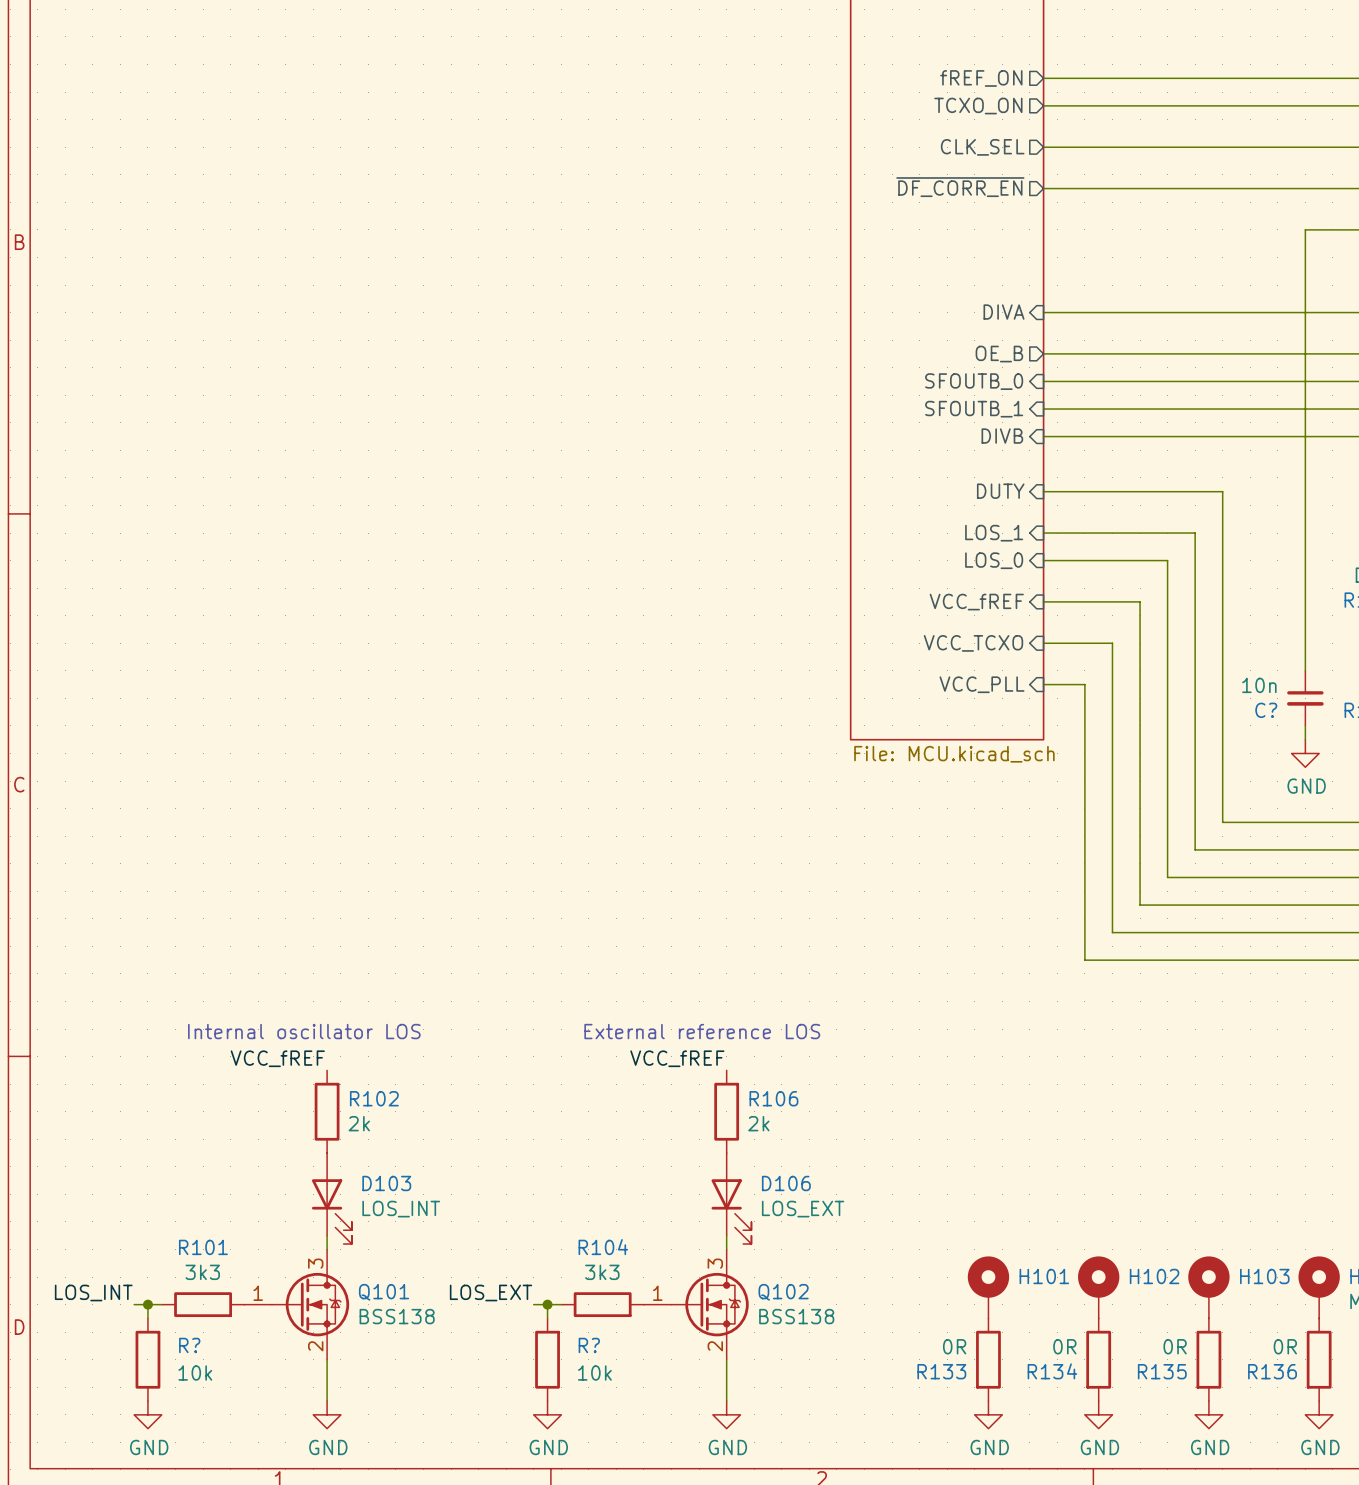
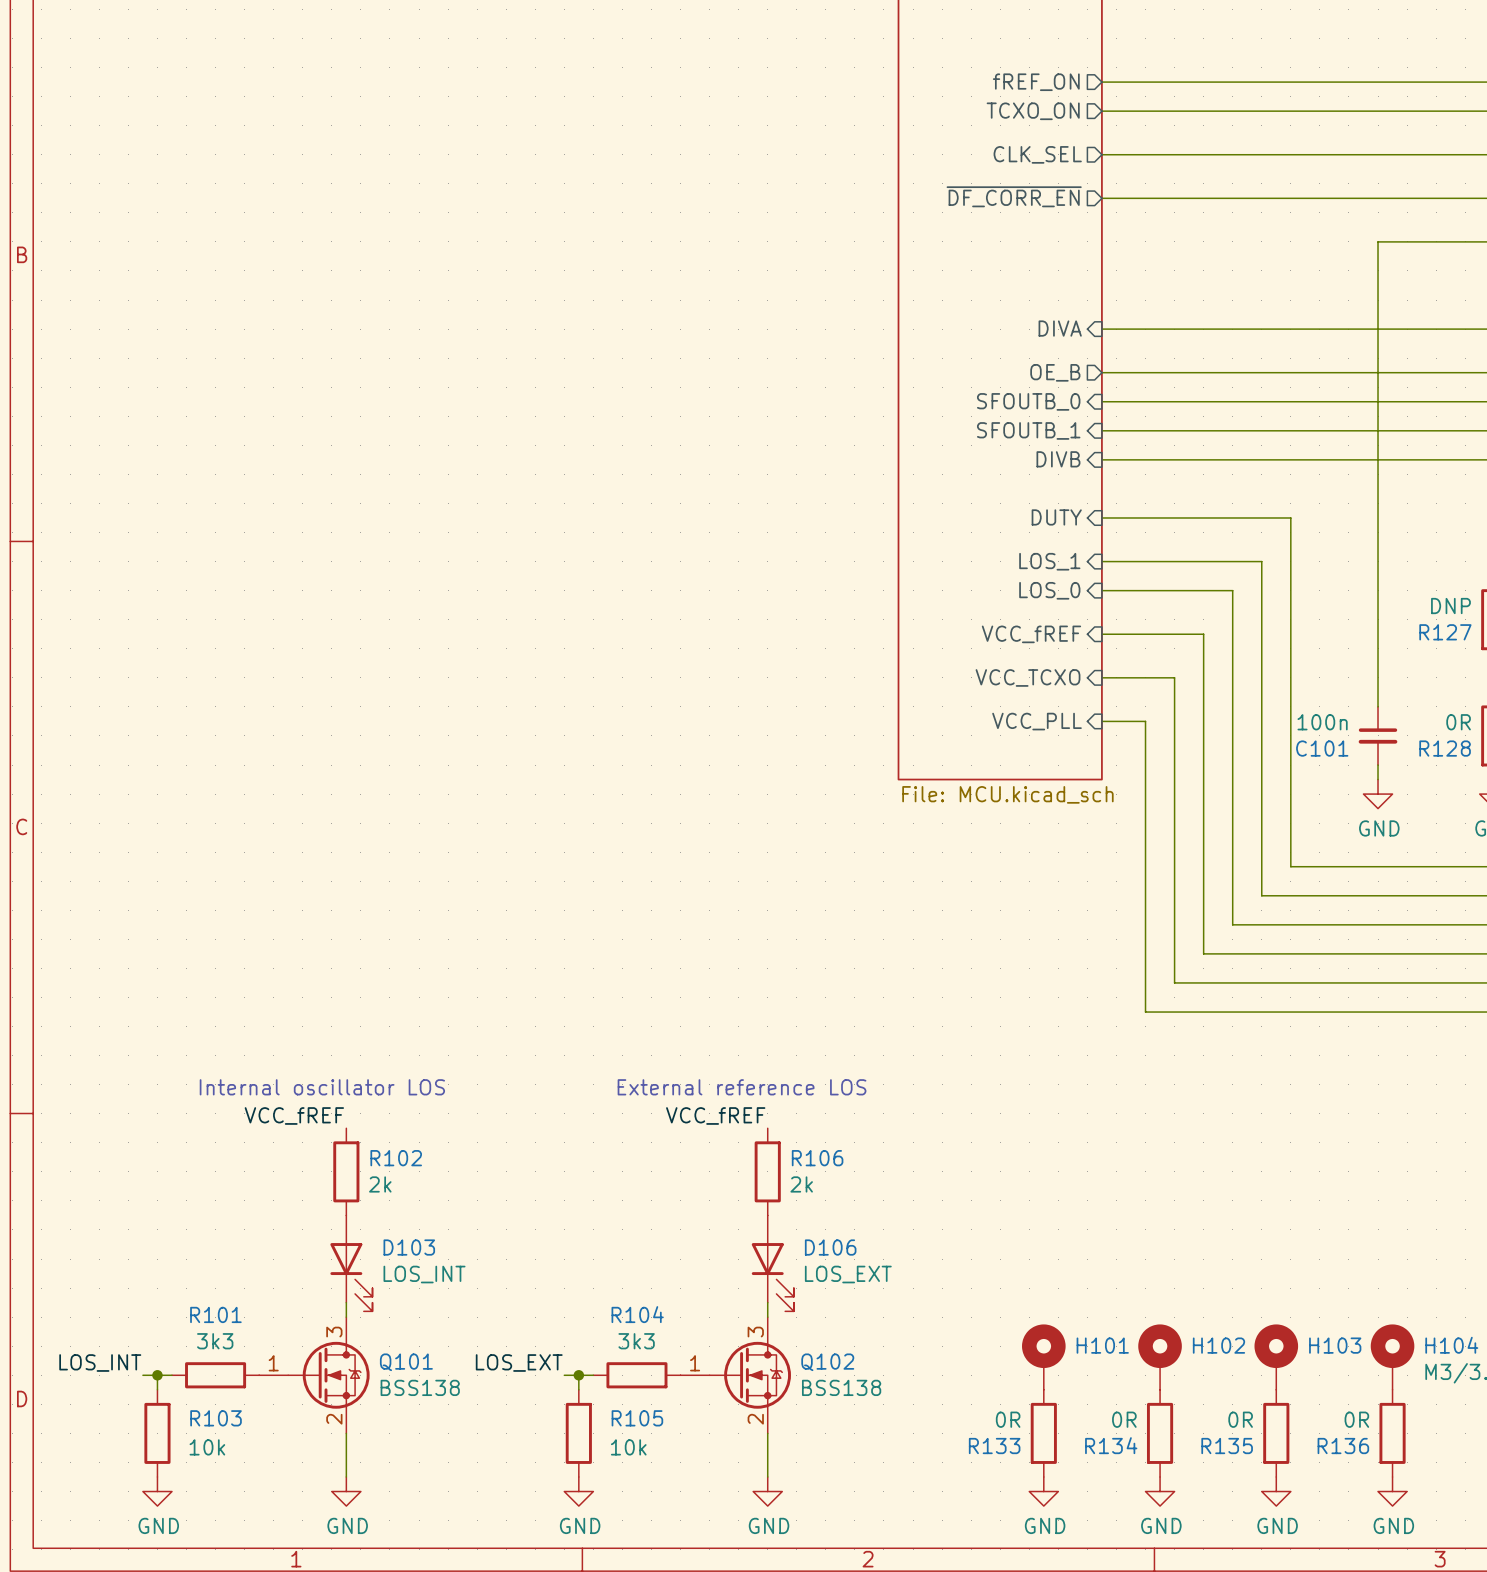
C? value: 10n (1259, 685) -> 100n (1322, 722)
C? name: C? (1266, 710) -> C101 (1322, 748)
R? name: R? (189, 1345) -> R103 (216, 1418)
R? name: R? (589, 1345) -> R105 (637, 1418)

